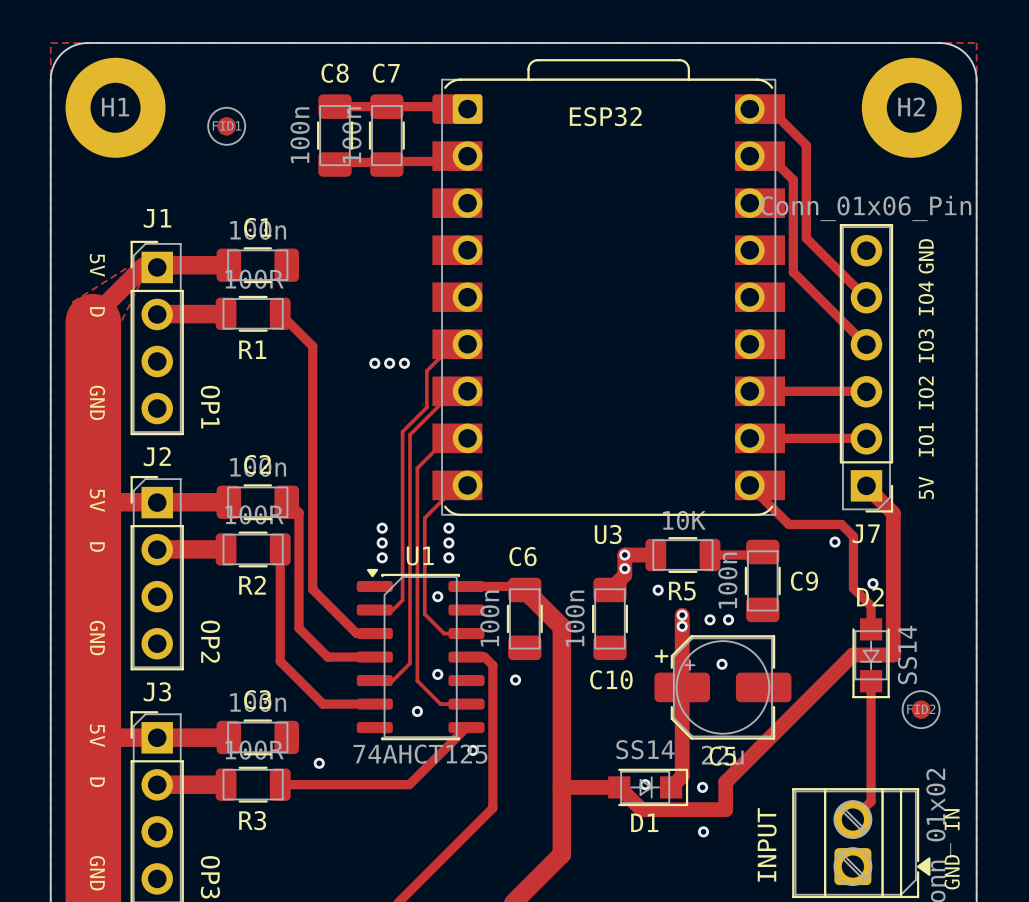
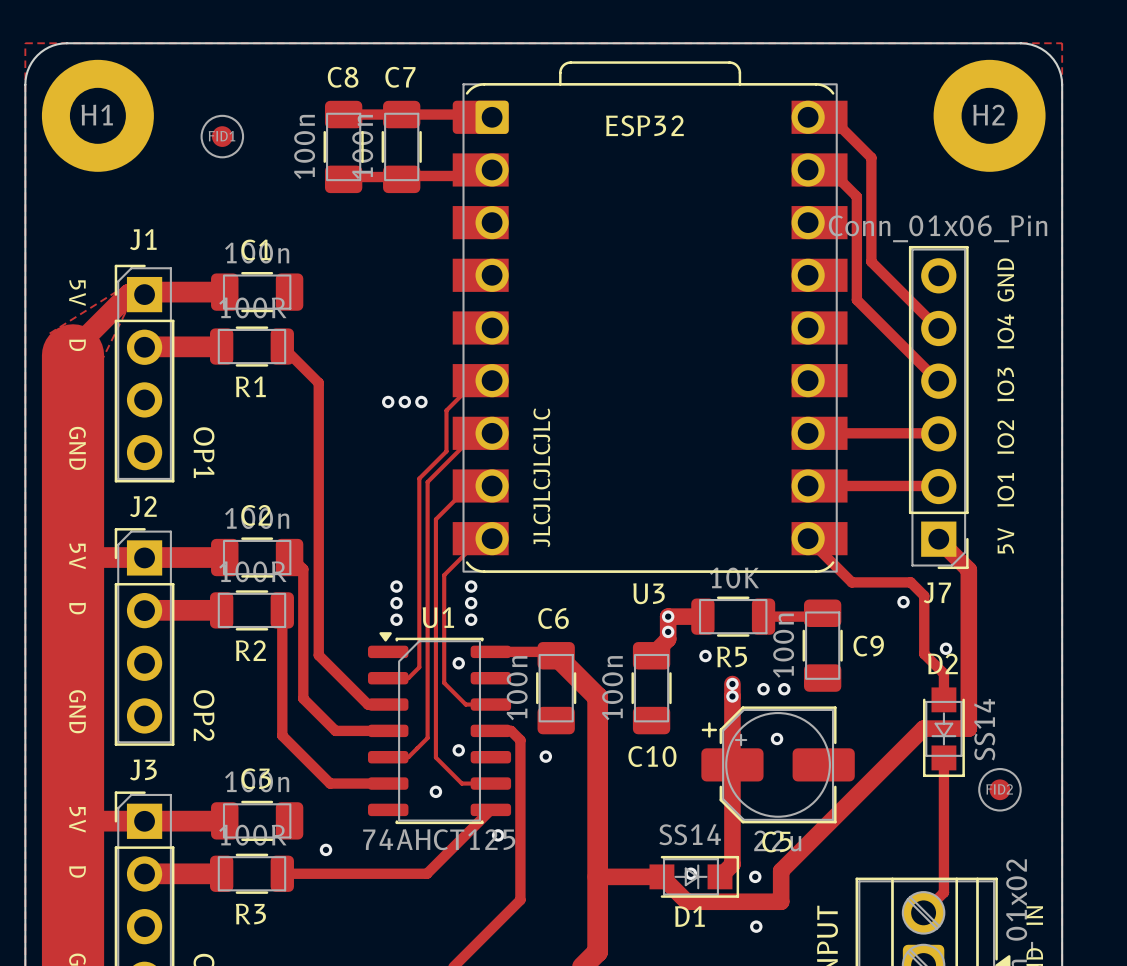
text: none -> JLCJLCJLCJLC (541, 477)

